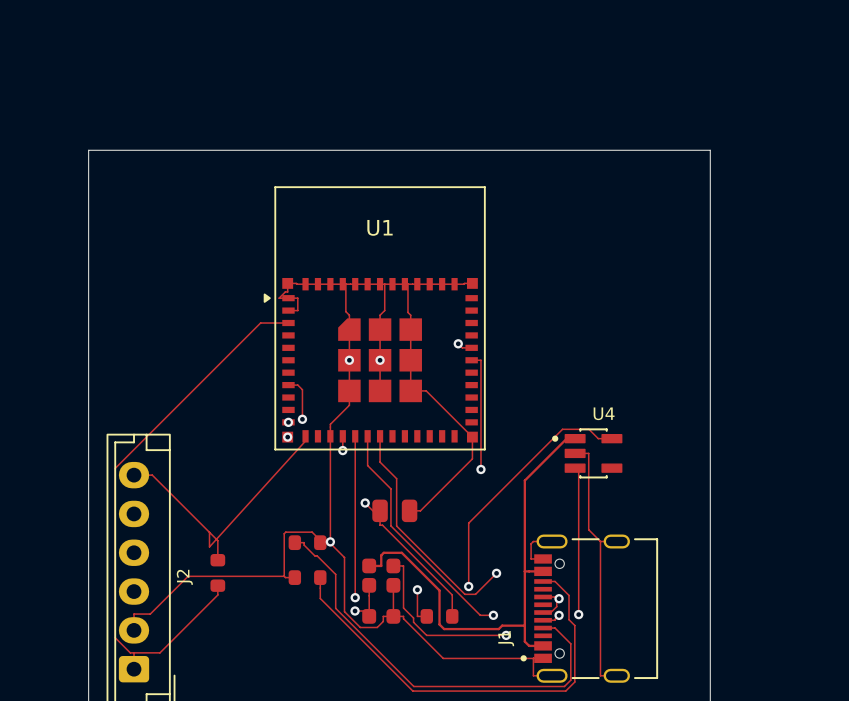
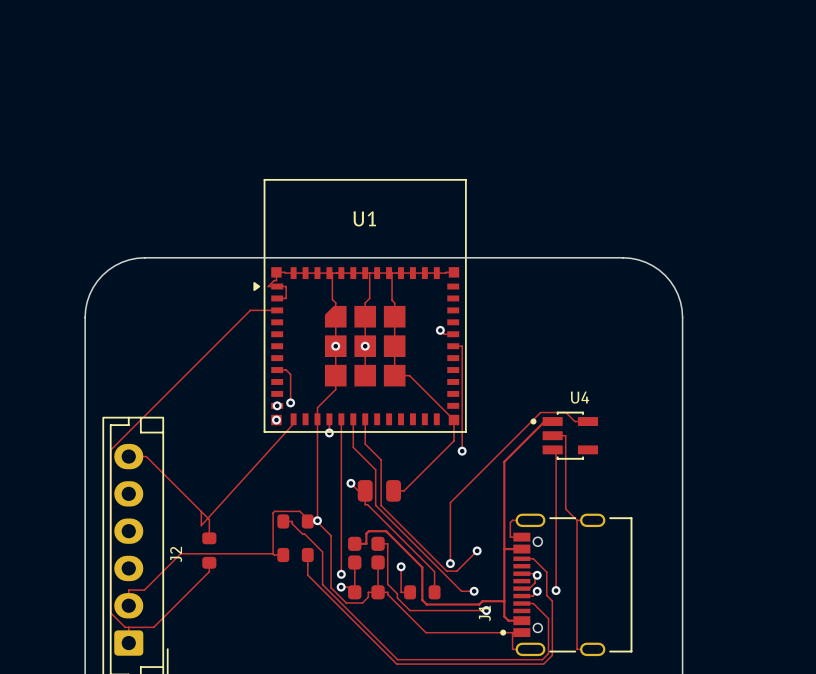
board edge: (88, 330) (88, 150) (710, 150) (710, 330) -> (85, 317) (89, 294) (102, 275) (121, 262) (144, 257) (630, 258) (645, 262) (665, 275) (678, 294) (682, 317)

